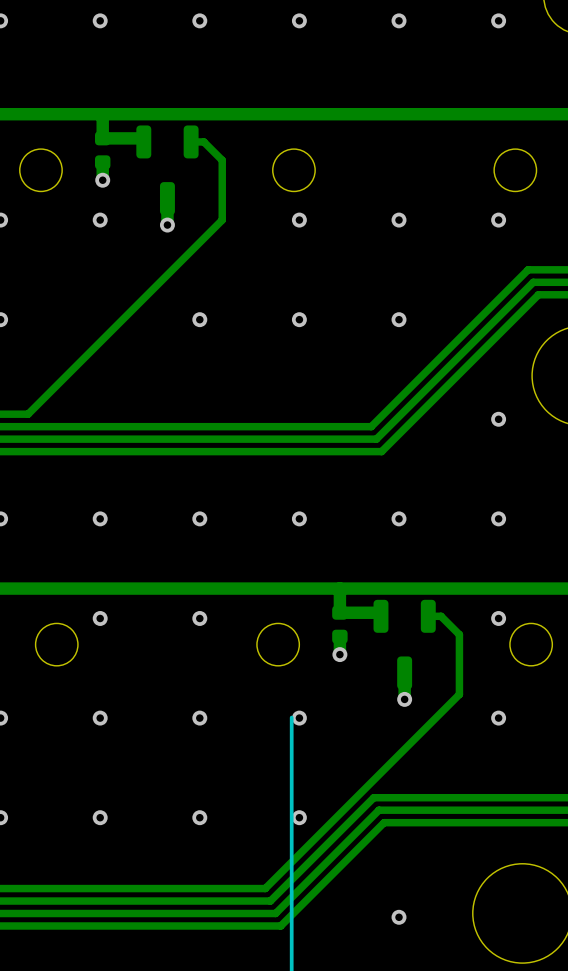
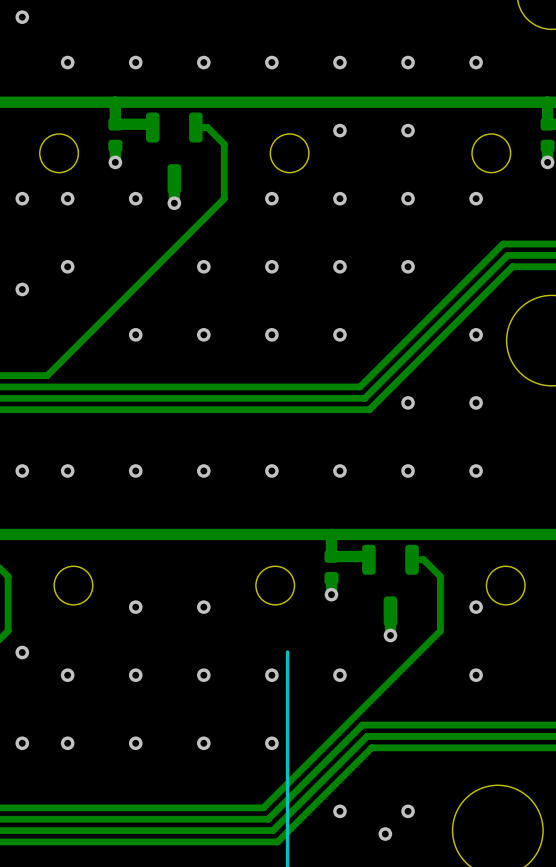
via: (100, 20) -> none
via: (199, 20) -> none
via: (299, 20) -> none
via: (399, 20) -> none
via: (498, 20) -> none
via: none -> (67, 62)
via: none -> (135, 62)
via: none -> (203, 62)
via: none -> (271, 62)
via: none -> (339, 62)
via: none -> (408, 62)
via: none -> (476, 62)
via: none -> (339, 130)
via: none -> (408, 130)
via: none -> (67, 198)
via: (100, 220) -> none
via: none -> (135, 198)
via: none -> (271, 198)
via: (299, 220) -> none
via: none -> (339, 198)
via: (399, 220) -> none
via: none -> (408, 198)
via: none -> (67, 266)
via: none -> (203, 266)
via: none -> (271, 266)
via: none -> (339, 266)
via: none -> (408, 266)
via: (199, 319) -> none
via: (299, 319) -> none
via: (399, 319) -> none
via: none -> (135, 334)
via: none -> (203, 334)
via: none -> (271, 334)
via: none -> (339, 334)
via: none -> (476, 334)
via: (498, 419) -> none
via: none -> (408, 402)
via: none -> (476, 402)
via: none -> (67, 470)
via: (100, 518) -> none
via: none -> (135, 470)
via: none -> (271, 470)
via: (299, 518) -> none
via: none -> (339, 470)
via: (399, 518) -> none
via: none -> (408, 470)
via: (100, 618) -> none
via: (199, 618) -> none
via: (498, 618) -> none
via: none -> (135, 607)
via: none -> (203, 607)
via: none -> (476, 607)
via: (100, 718) -> none
via: (199, 718) -> none
via: (299, 718) -> none
via: (498, 718) -> none
via: none -> (67, 675)
via: none -> (135, 675)
via: none -> (203, 675)
via: none -> (271, 675)
via: none -> (339, 675)
via: none -> (476, 675)
via: none -> (67, 743)
via: (100, 817) -> none
via: none -> (135, 743)
via position: (299, 817) -> (271, 743)
via: none -> (339, 811)
via: none -> (408, 811)

